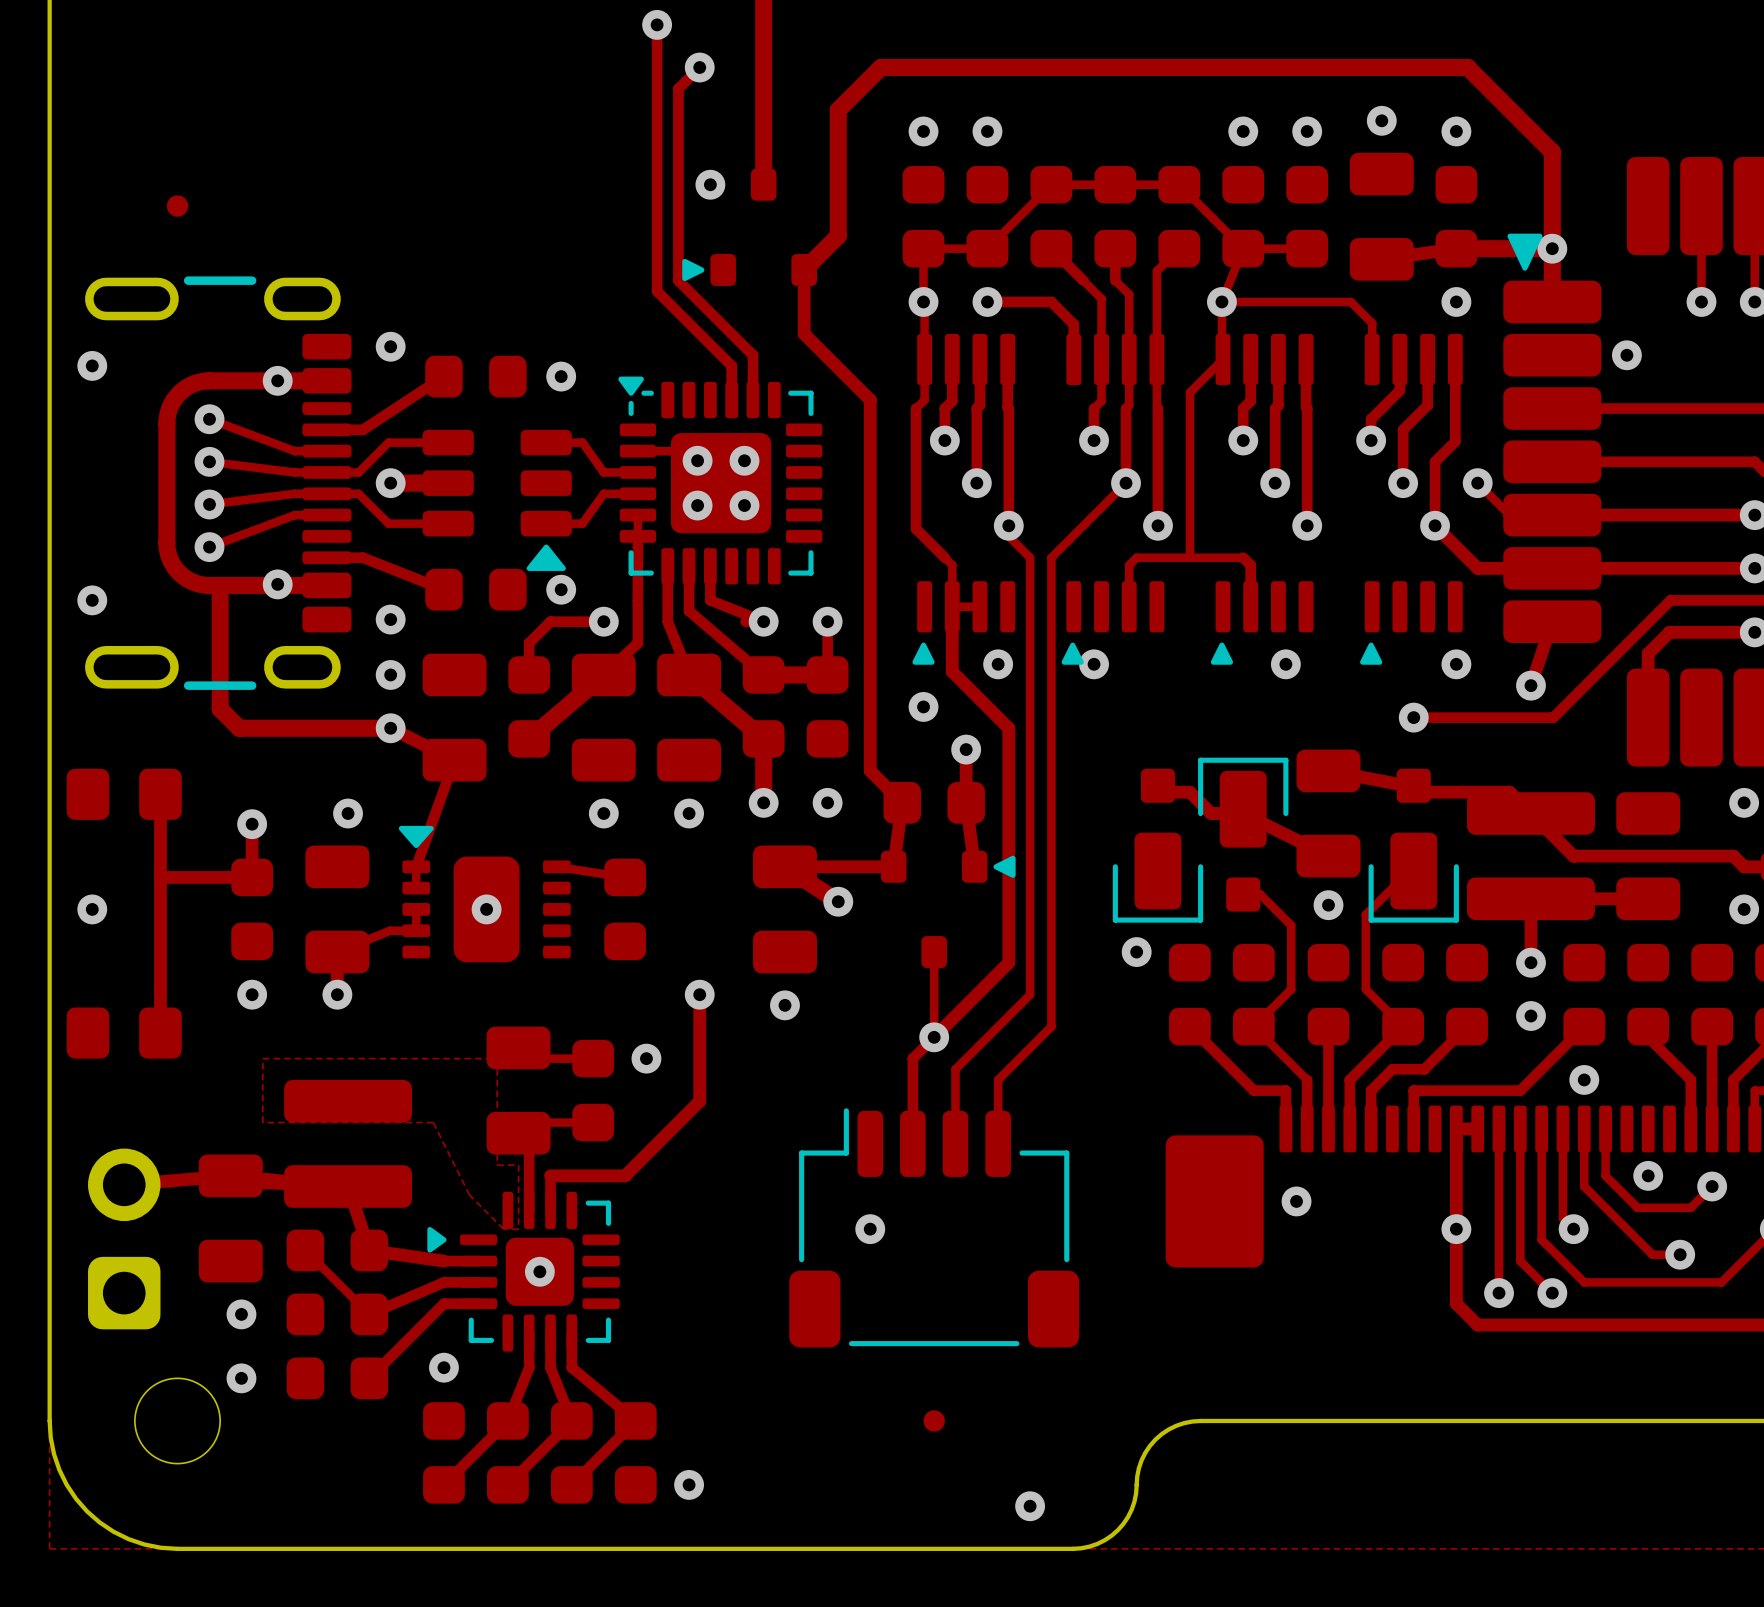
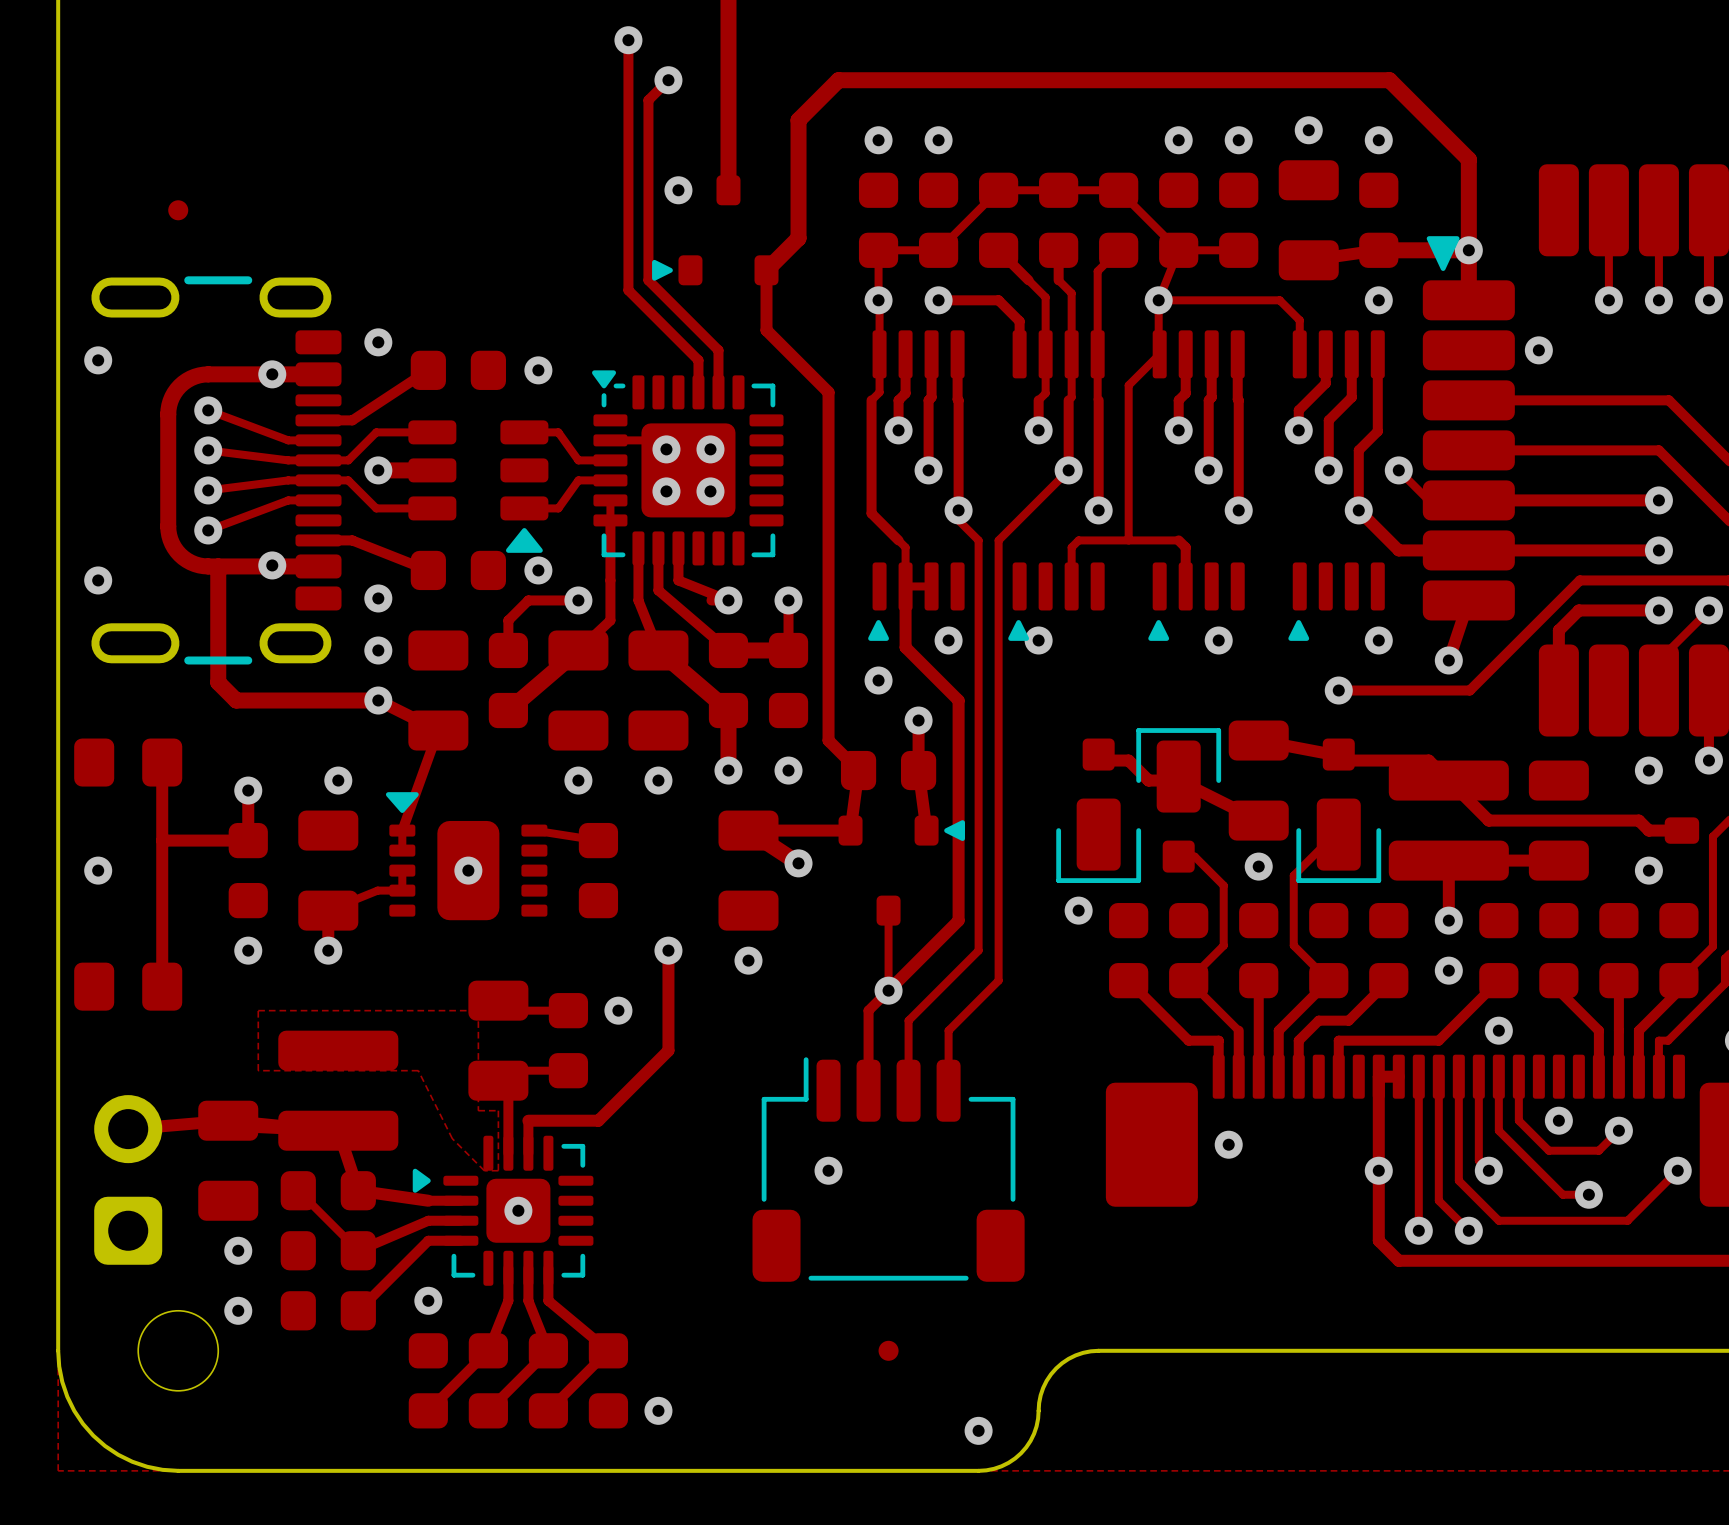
board edge: (1200, 1420) (1184, 1423) (1168, 1429) (1149, 1445) (1138, 1468) (1136, 1493) (1131, 1509) (1123, 1523) (1111, 1535) (1097, 1543) (1081, 1548) (1030, 1548) -> (1138, 1350) (1090, 1351) (1075, 1355) (1062, 1363) (1051, 1374) (1043, 1387) (1036, 1426) (1026, 1447) (1008, 1462) (994, 1468) (978, 1470)

